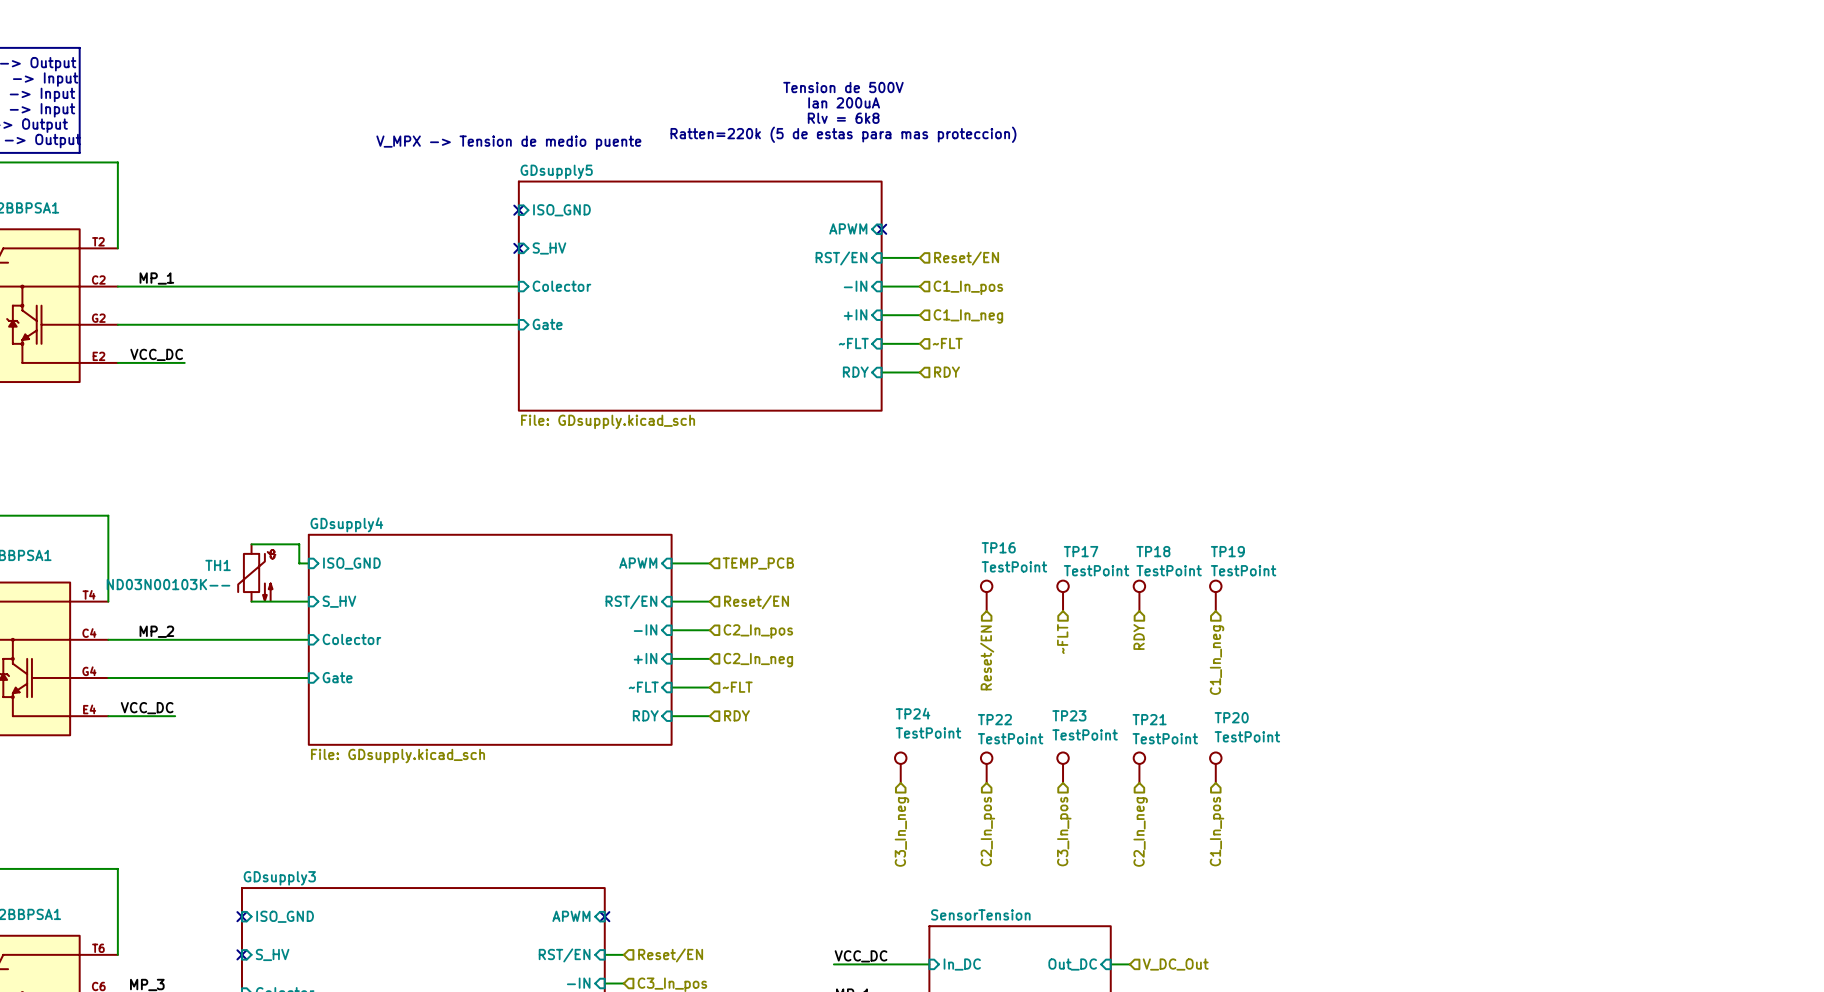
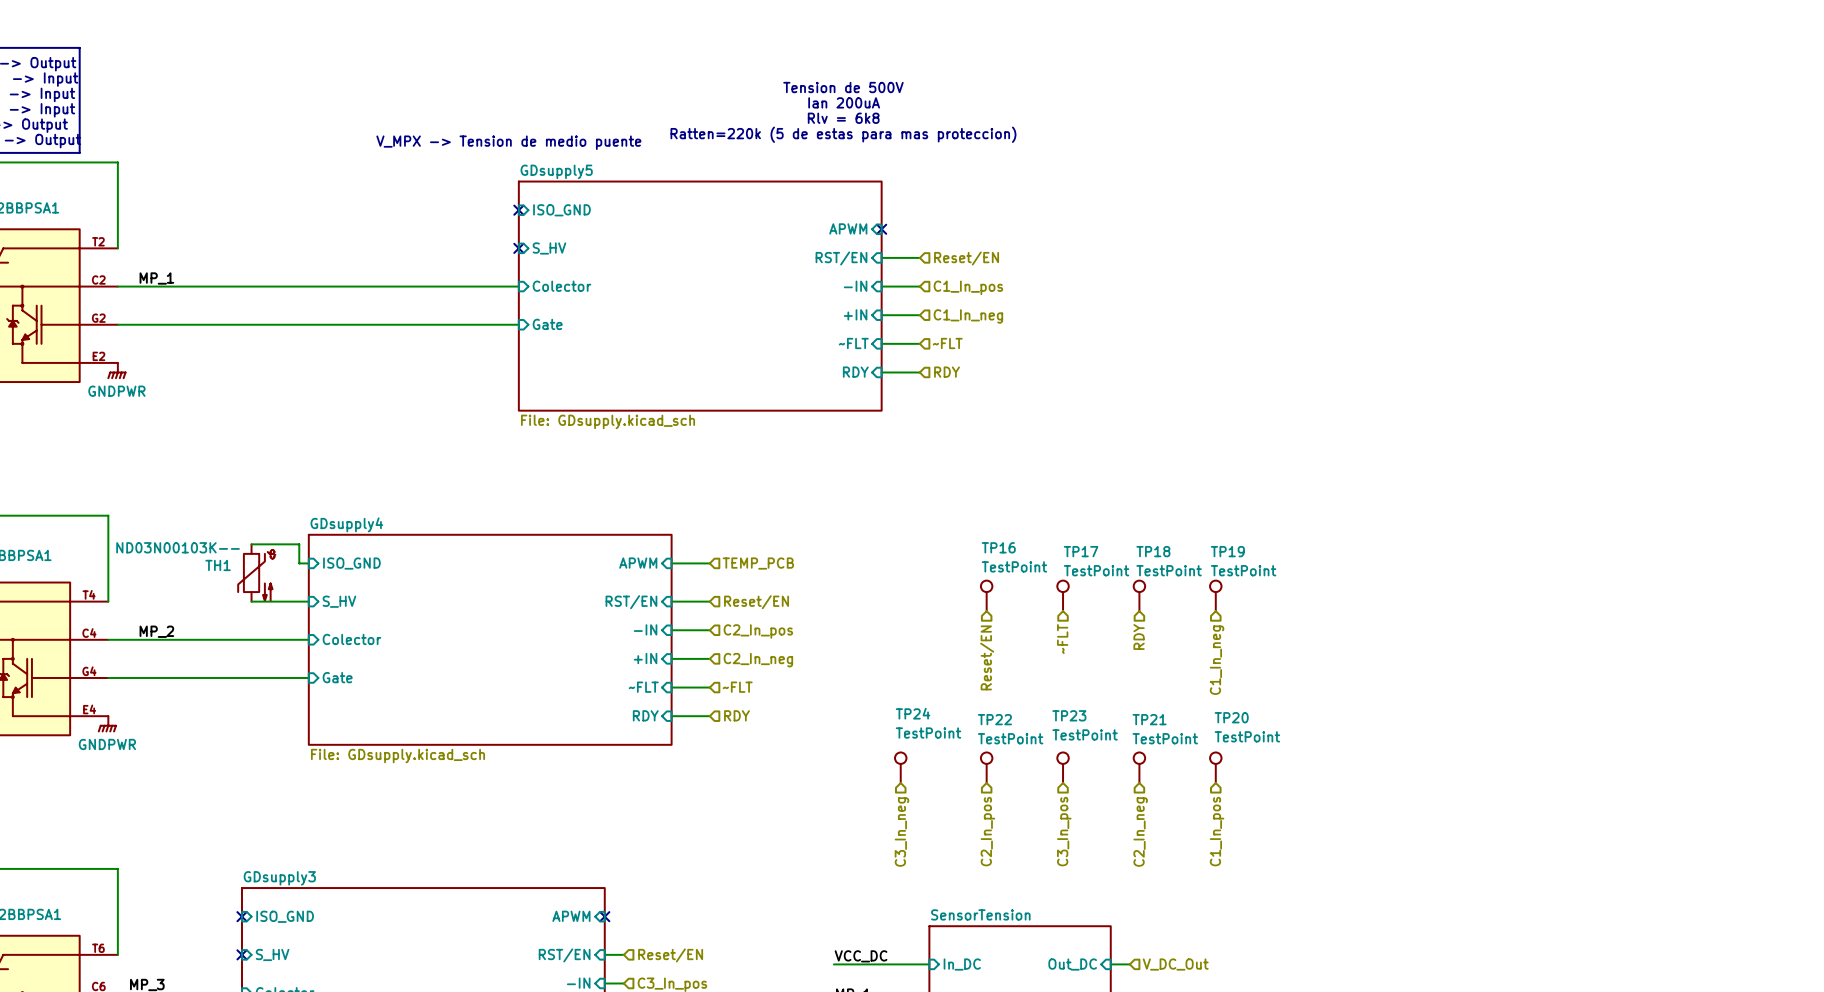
label: VCC_DC (156, 354) -> none
wire: (117, 362) (184, 362) -> none
power symbol: none -> GNDPWR (116, 370)
TH1 value position: ND03N00103K-- (168, 584) -> ND03N00103K-- (178, 547)
label: VCC_DC (147, 708) -> none
wire: (108, 716) (175, 716) -> none
power symbol: none -> GNDPWR (107, 724)

